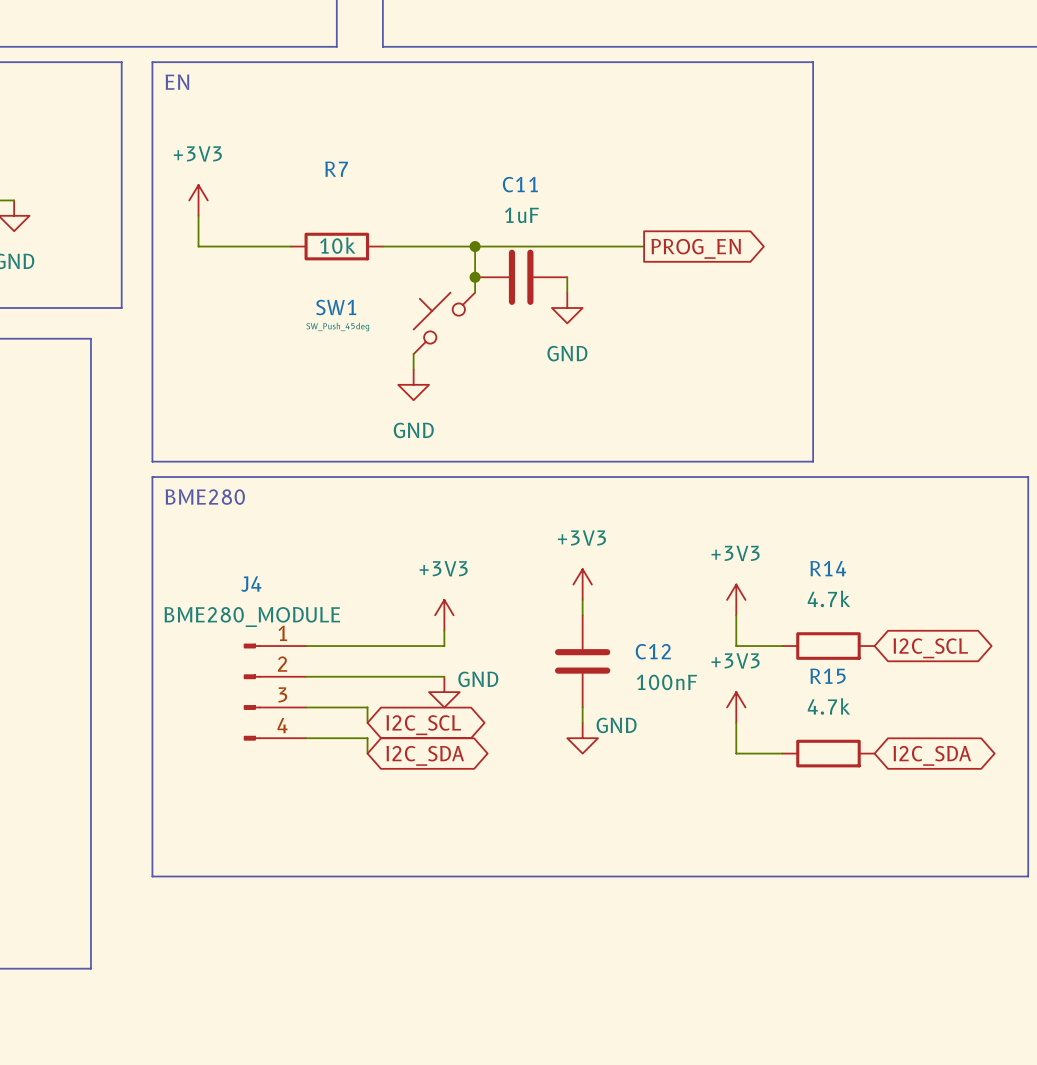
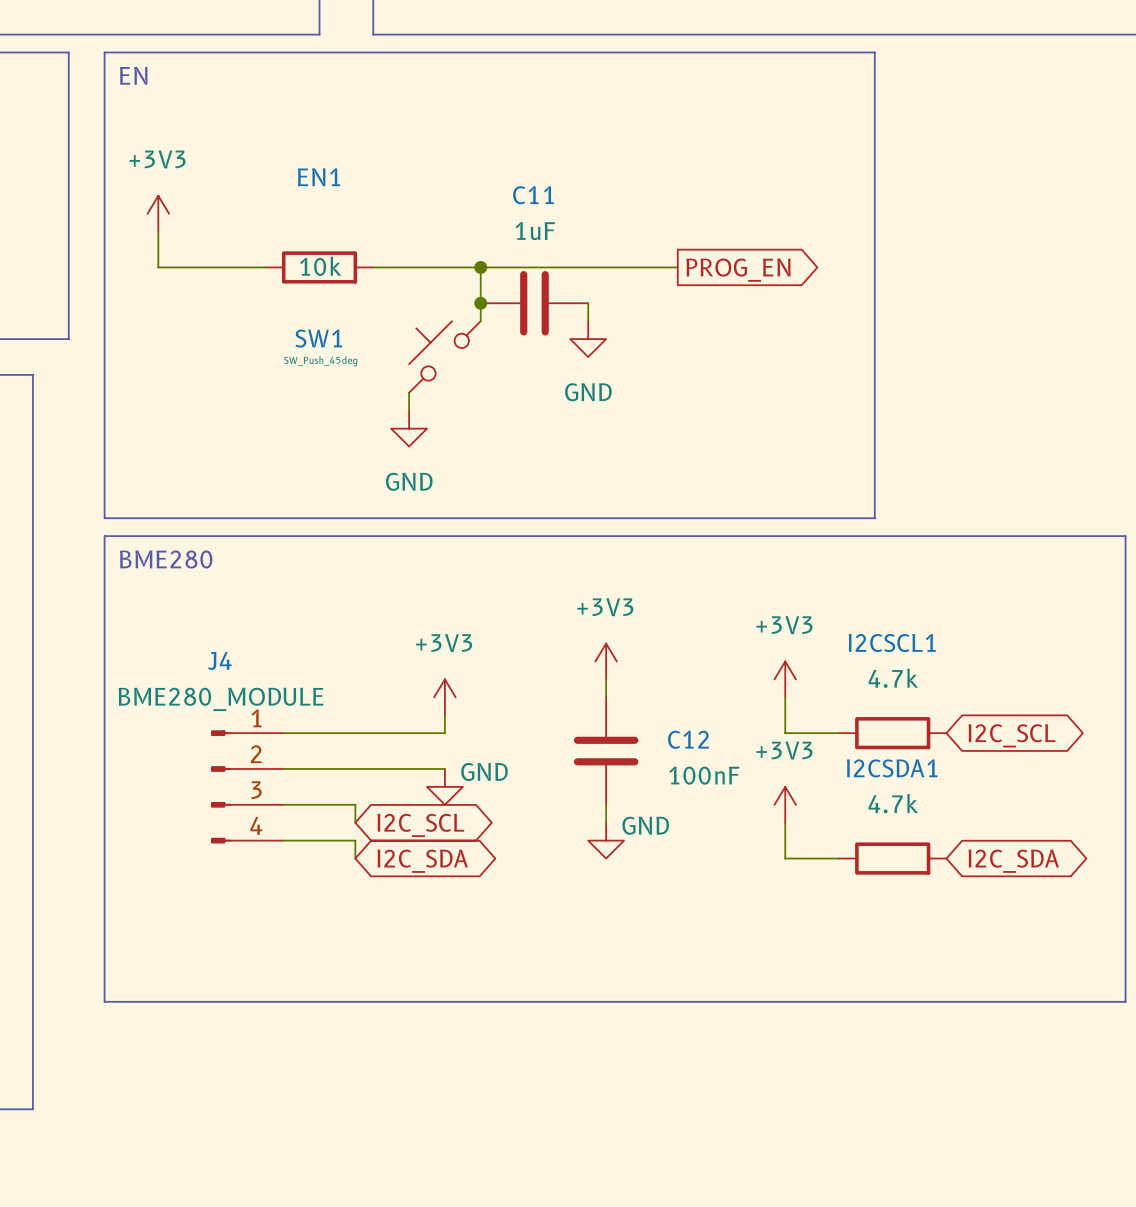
R7 name: R7 (336, 169) -> EN1 (319, 177)
R14 name: R14 (828, 568) -> I2CSCL1 (892, 643)
R15 name: R15 (827, 676) -> I2CSDA1 (892, 768)

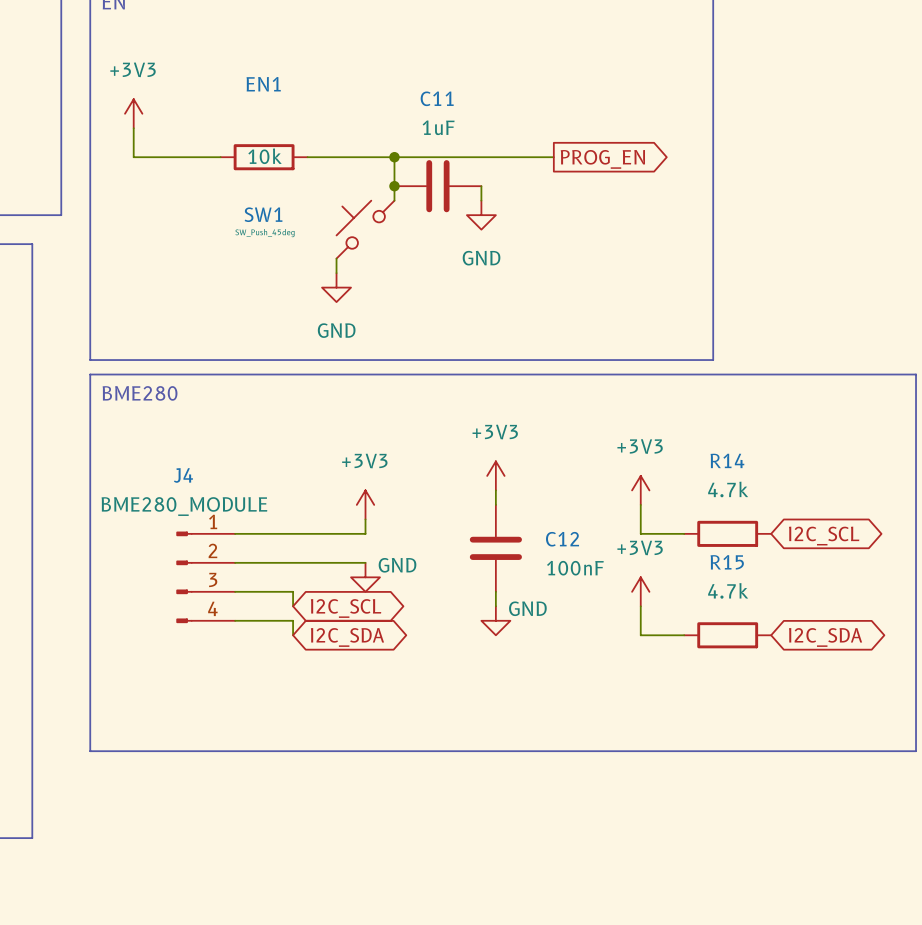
I2CSCL1 name: I2CSCL1 (892, 643) -> R14 (727, 460)
I2CSDA1 name: I2CSDA1 (892, 768) -> R15 (727, 562)

